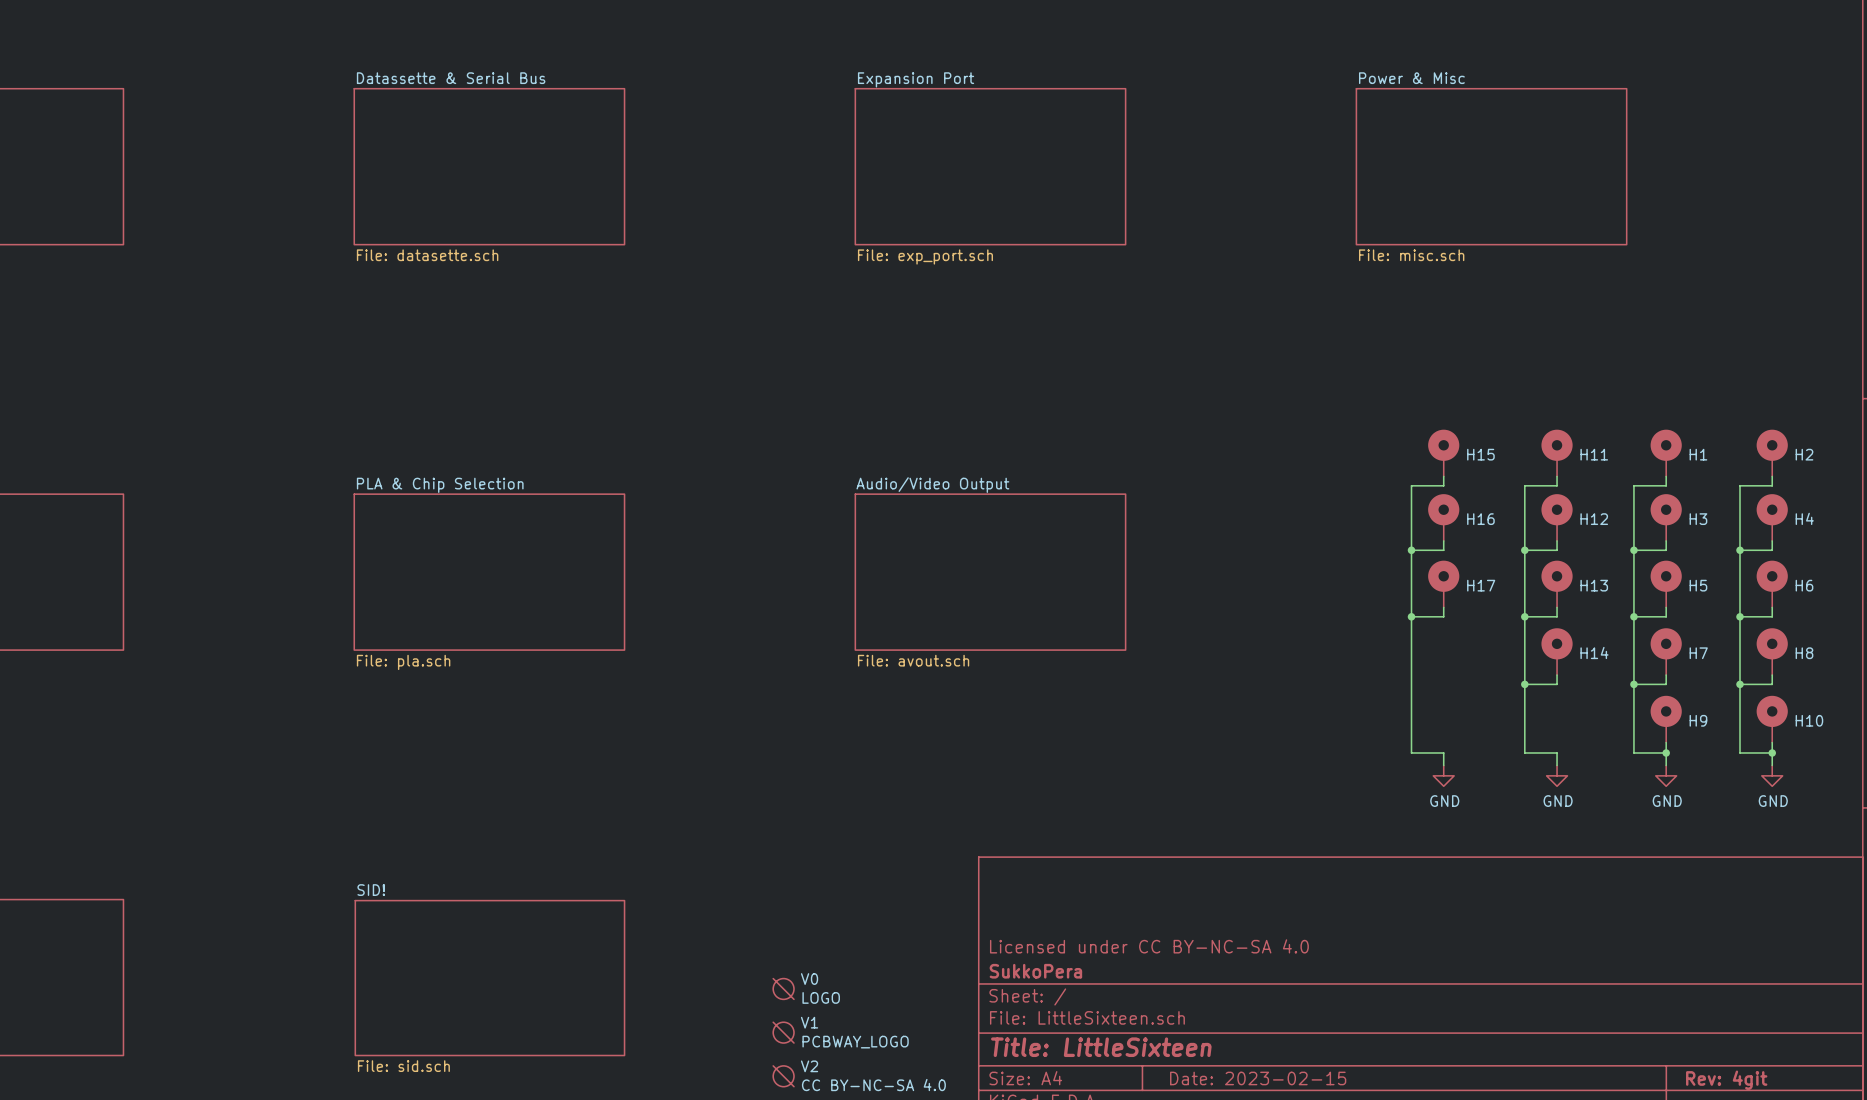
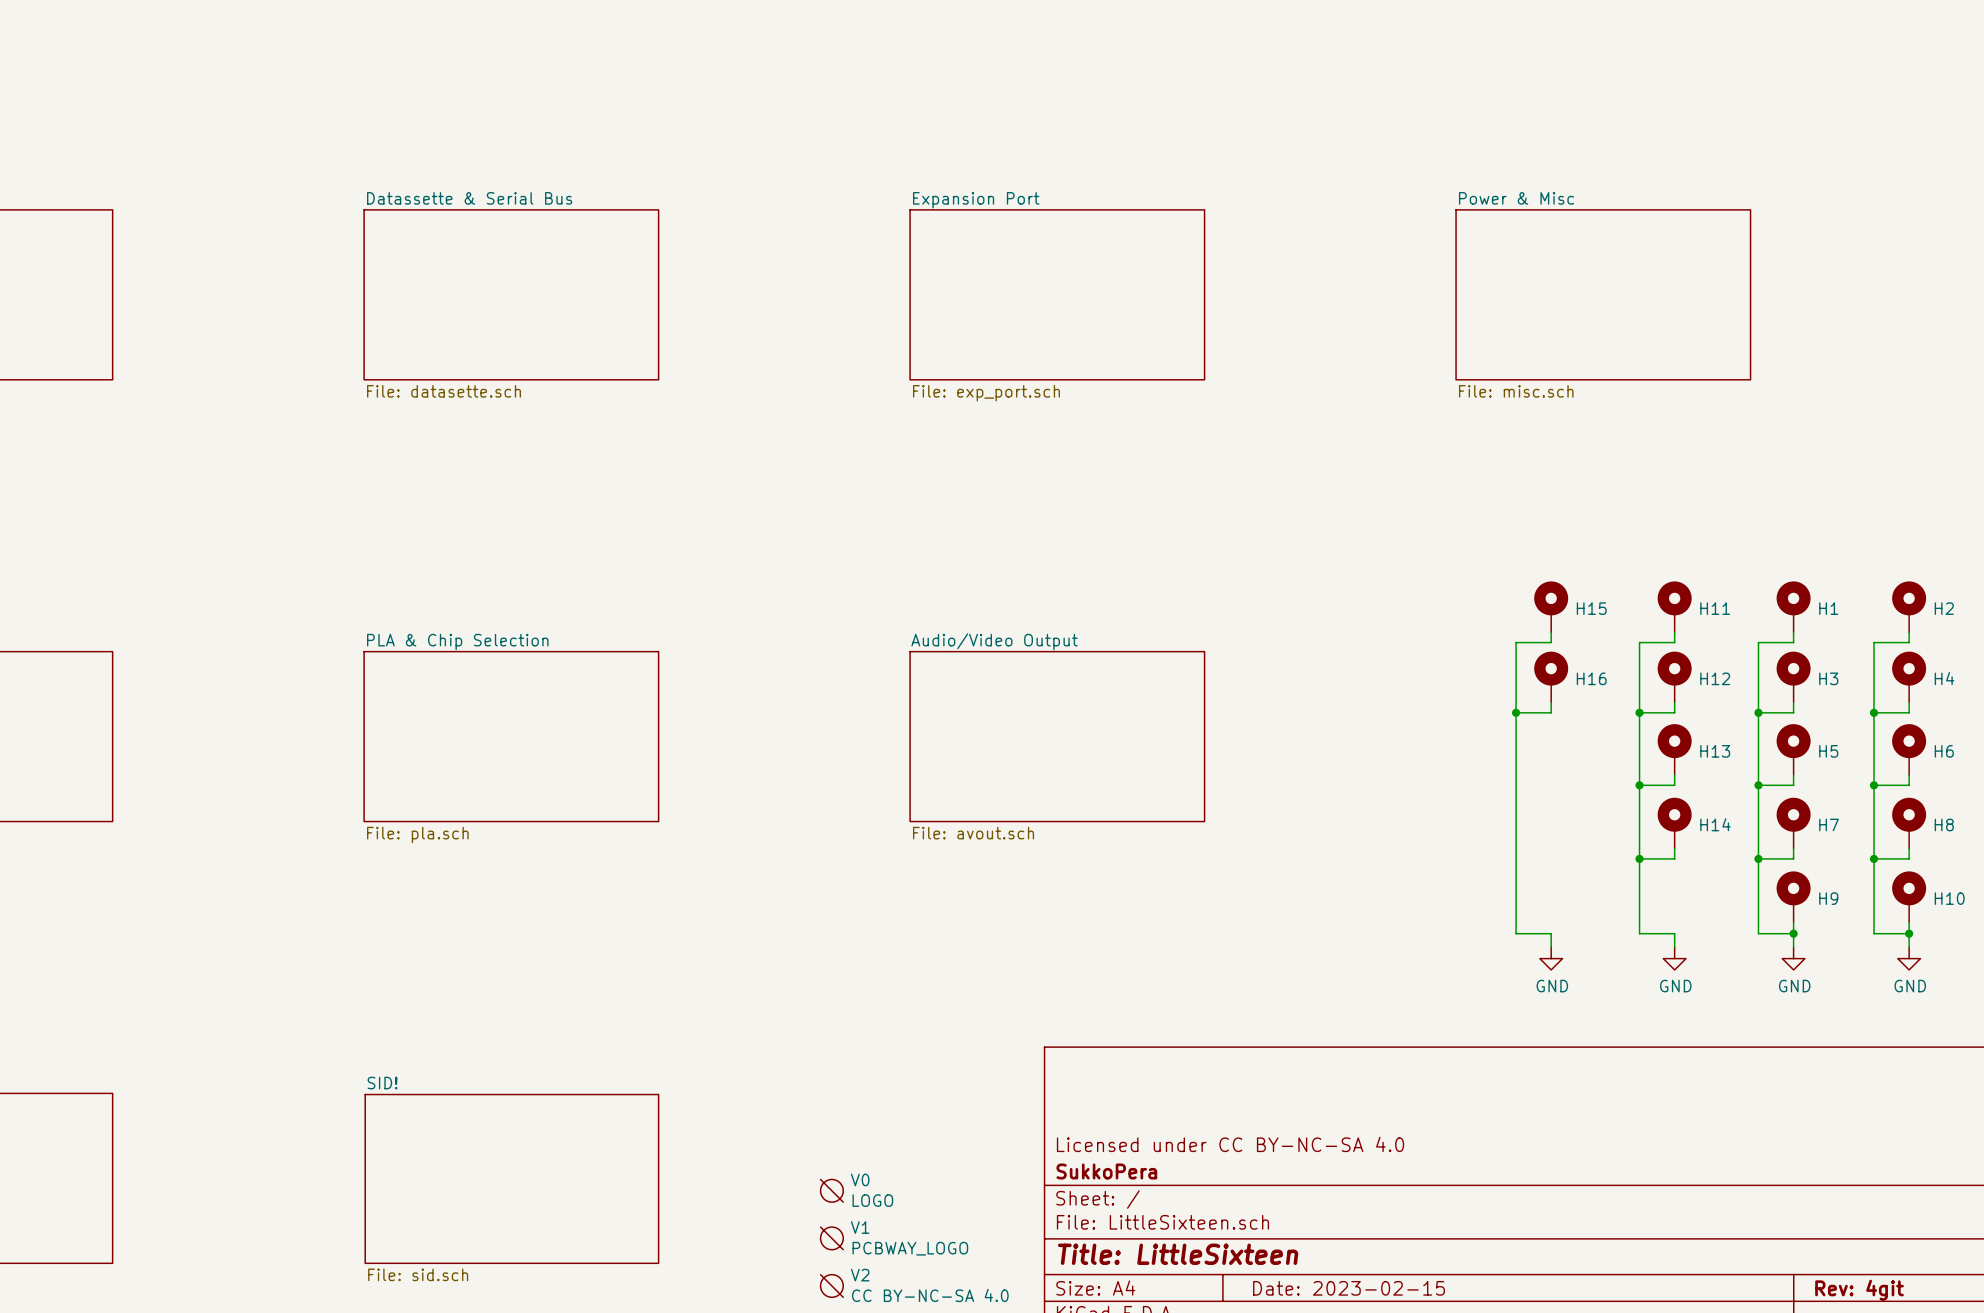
H17: (1443, 584) -> none
wire: (1443, 607) (1443, 616) (1411, 616) -> none
junction: (1411, 616) -> none

